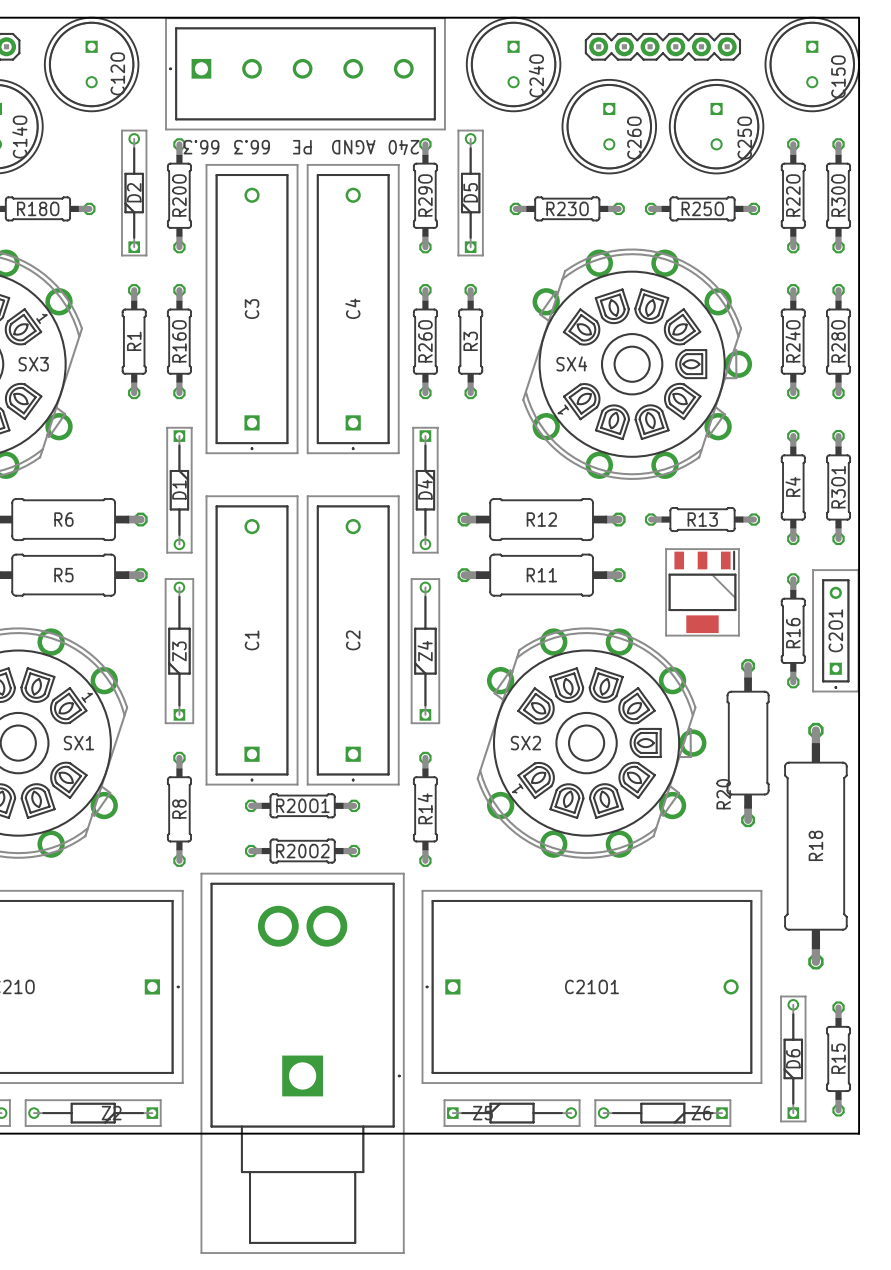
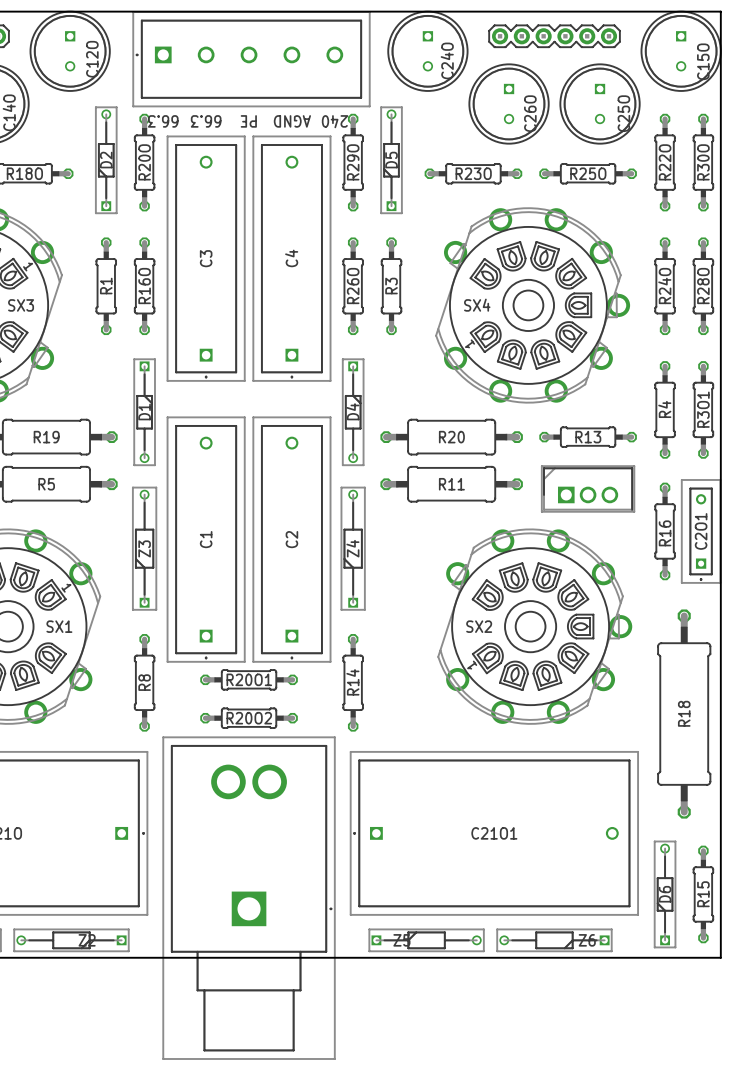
R6 name: R6 (63, 519) -> R19 (46, 437)
R12 name: R12 (541, 519) -> R20 (451, 437)
part: none -> (588, 488)
part: (702, 592) -> none
SX2 position: (591, 743) -> (534, 626)
R20: (748, 743) -> none

